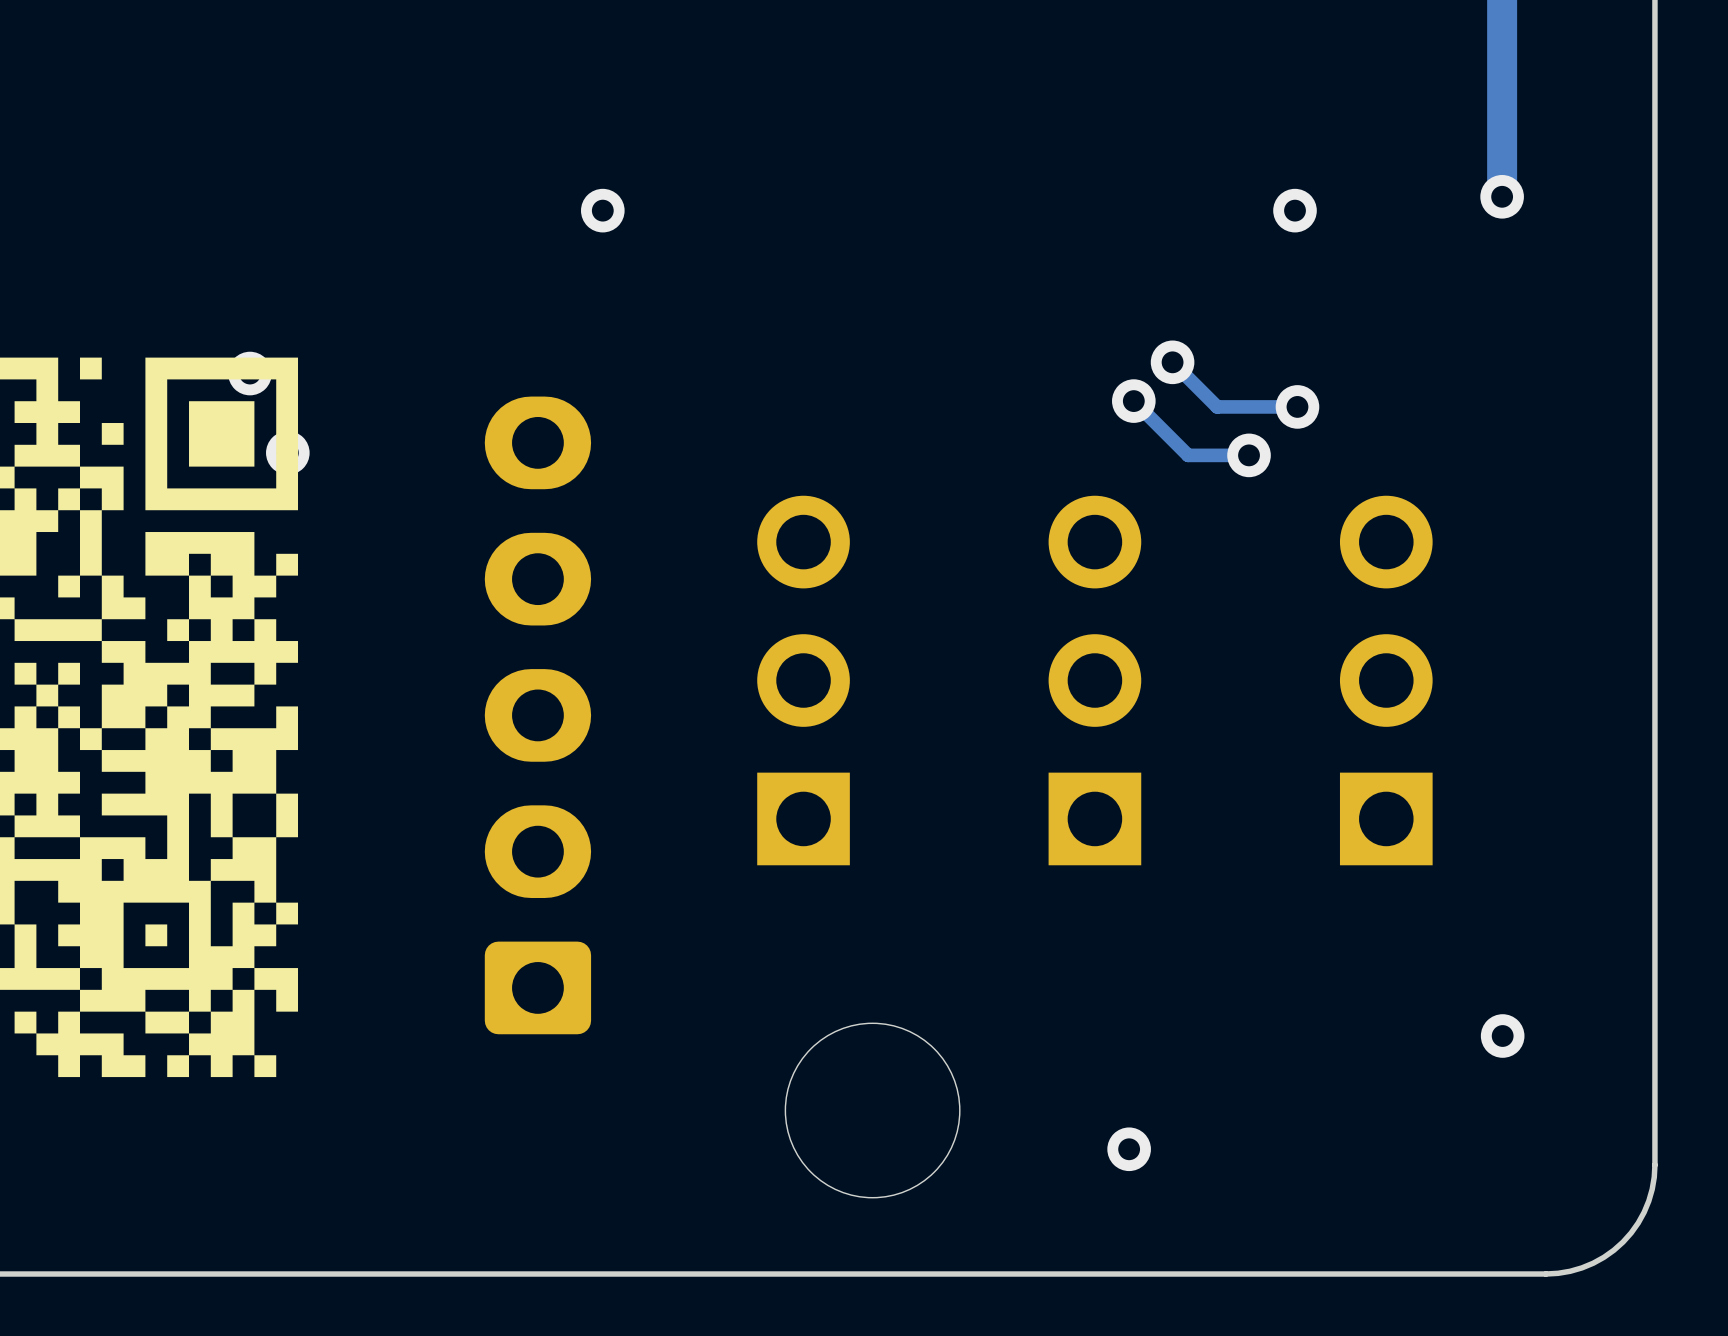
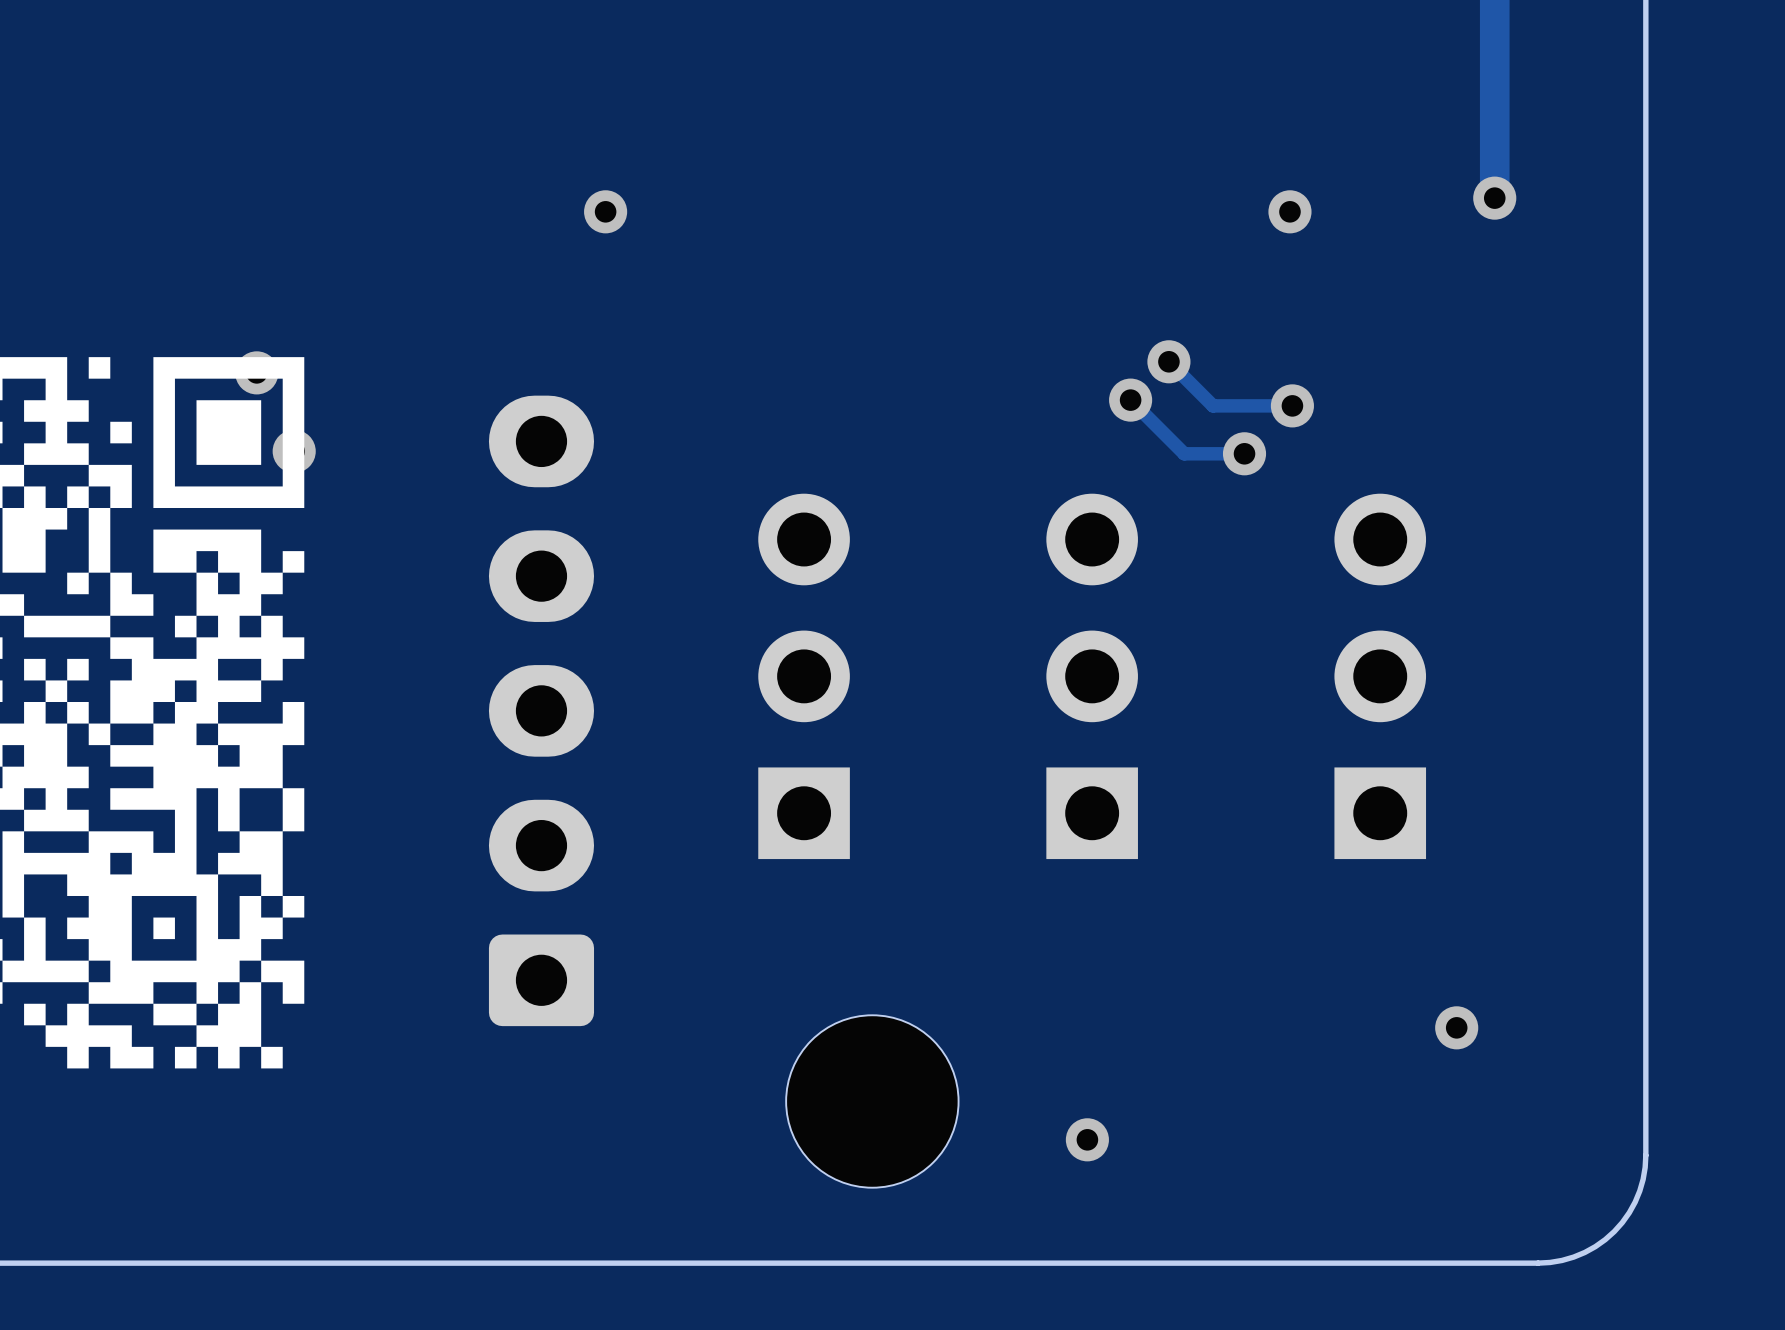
via position: (1502, 1036) -> (1456, 1027)
via position: (1129, 1149) -> (1087, 1139)

